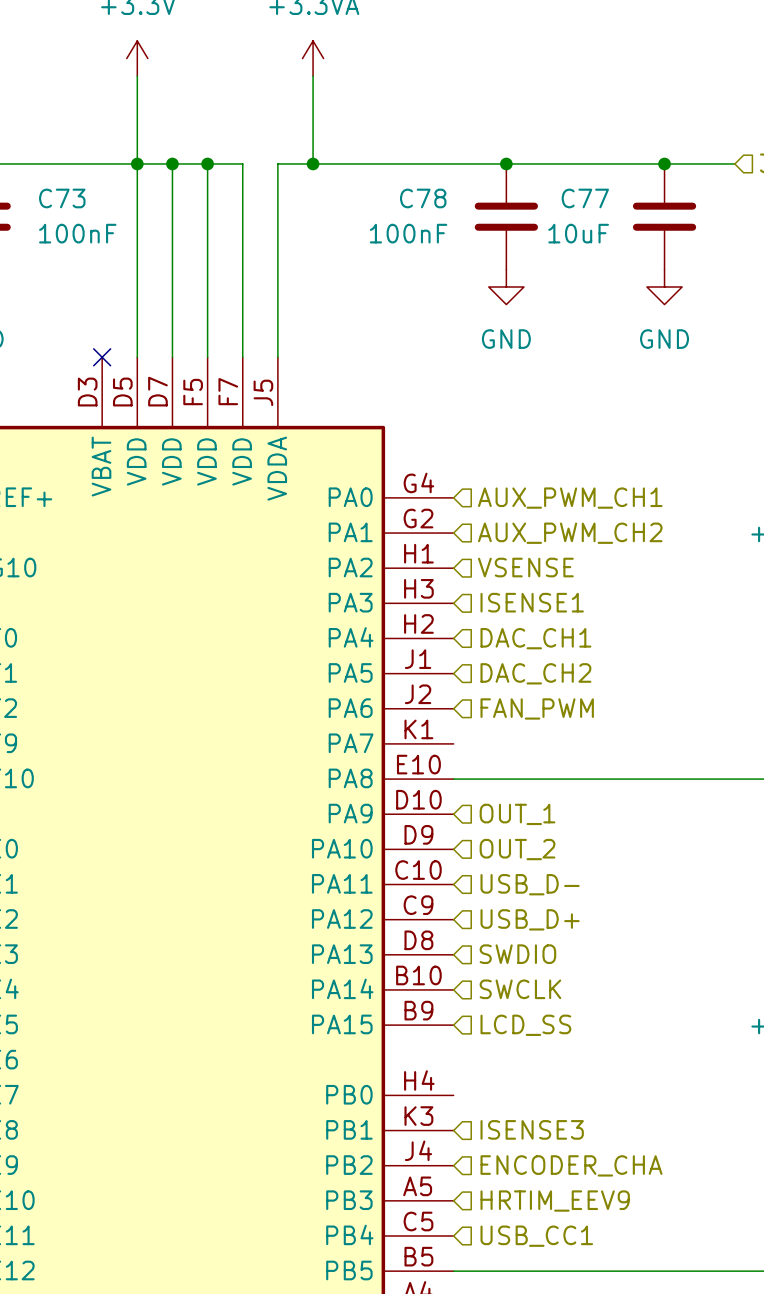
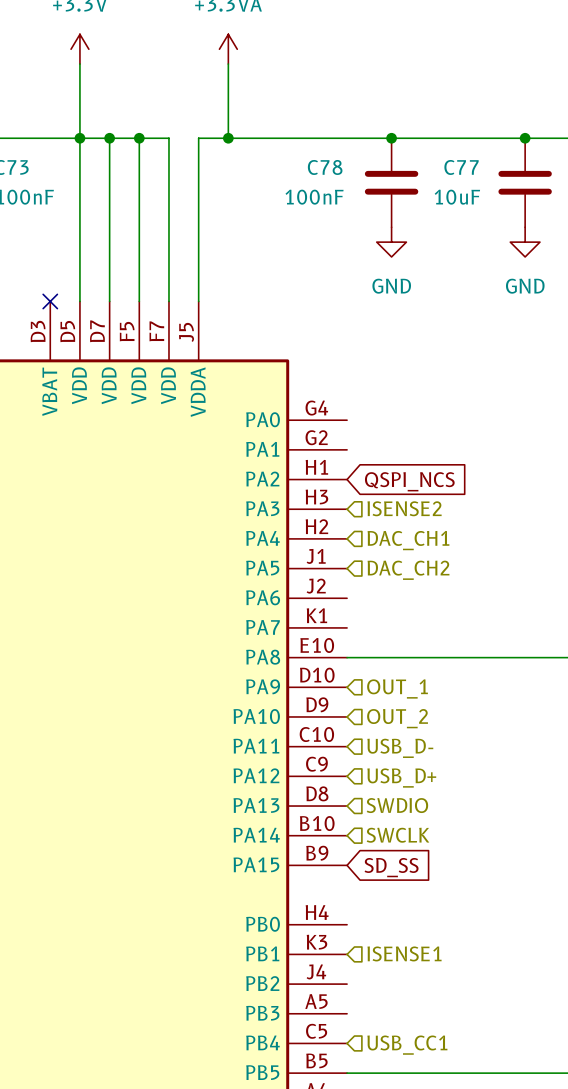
hierarchical label: AUX_PWM_CH1 (570, 498) -> none
hierarchical label: AUX_PWM_CH2 (570, 533) -> none
hierarchical label: VSENSE (525, 567) -> none
global label: none -> QSPI_NCS (409, 481)
hierarchical label: ISENSE1 (532, 602) -> ISENSE2 (404, 508)
hierarchical label: FAN_PWM (537, 708) -> none
global label: none -> SD_SS (391, 867)
hierarchical label: LCD_SS (525, 1025) -> none
hierarchical label: ISENSE3 (532, 1129) -> ISENSE1 (404, 953)
hierarchical label: ENCODER_CHA (571, 1165) -> none
hierarchical label: HRTIM_EEV9 (555, 1201) -> none

